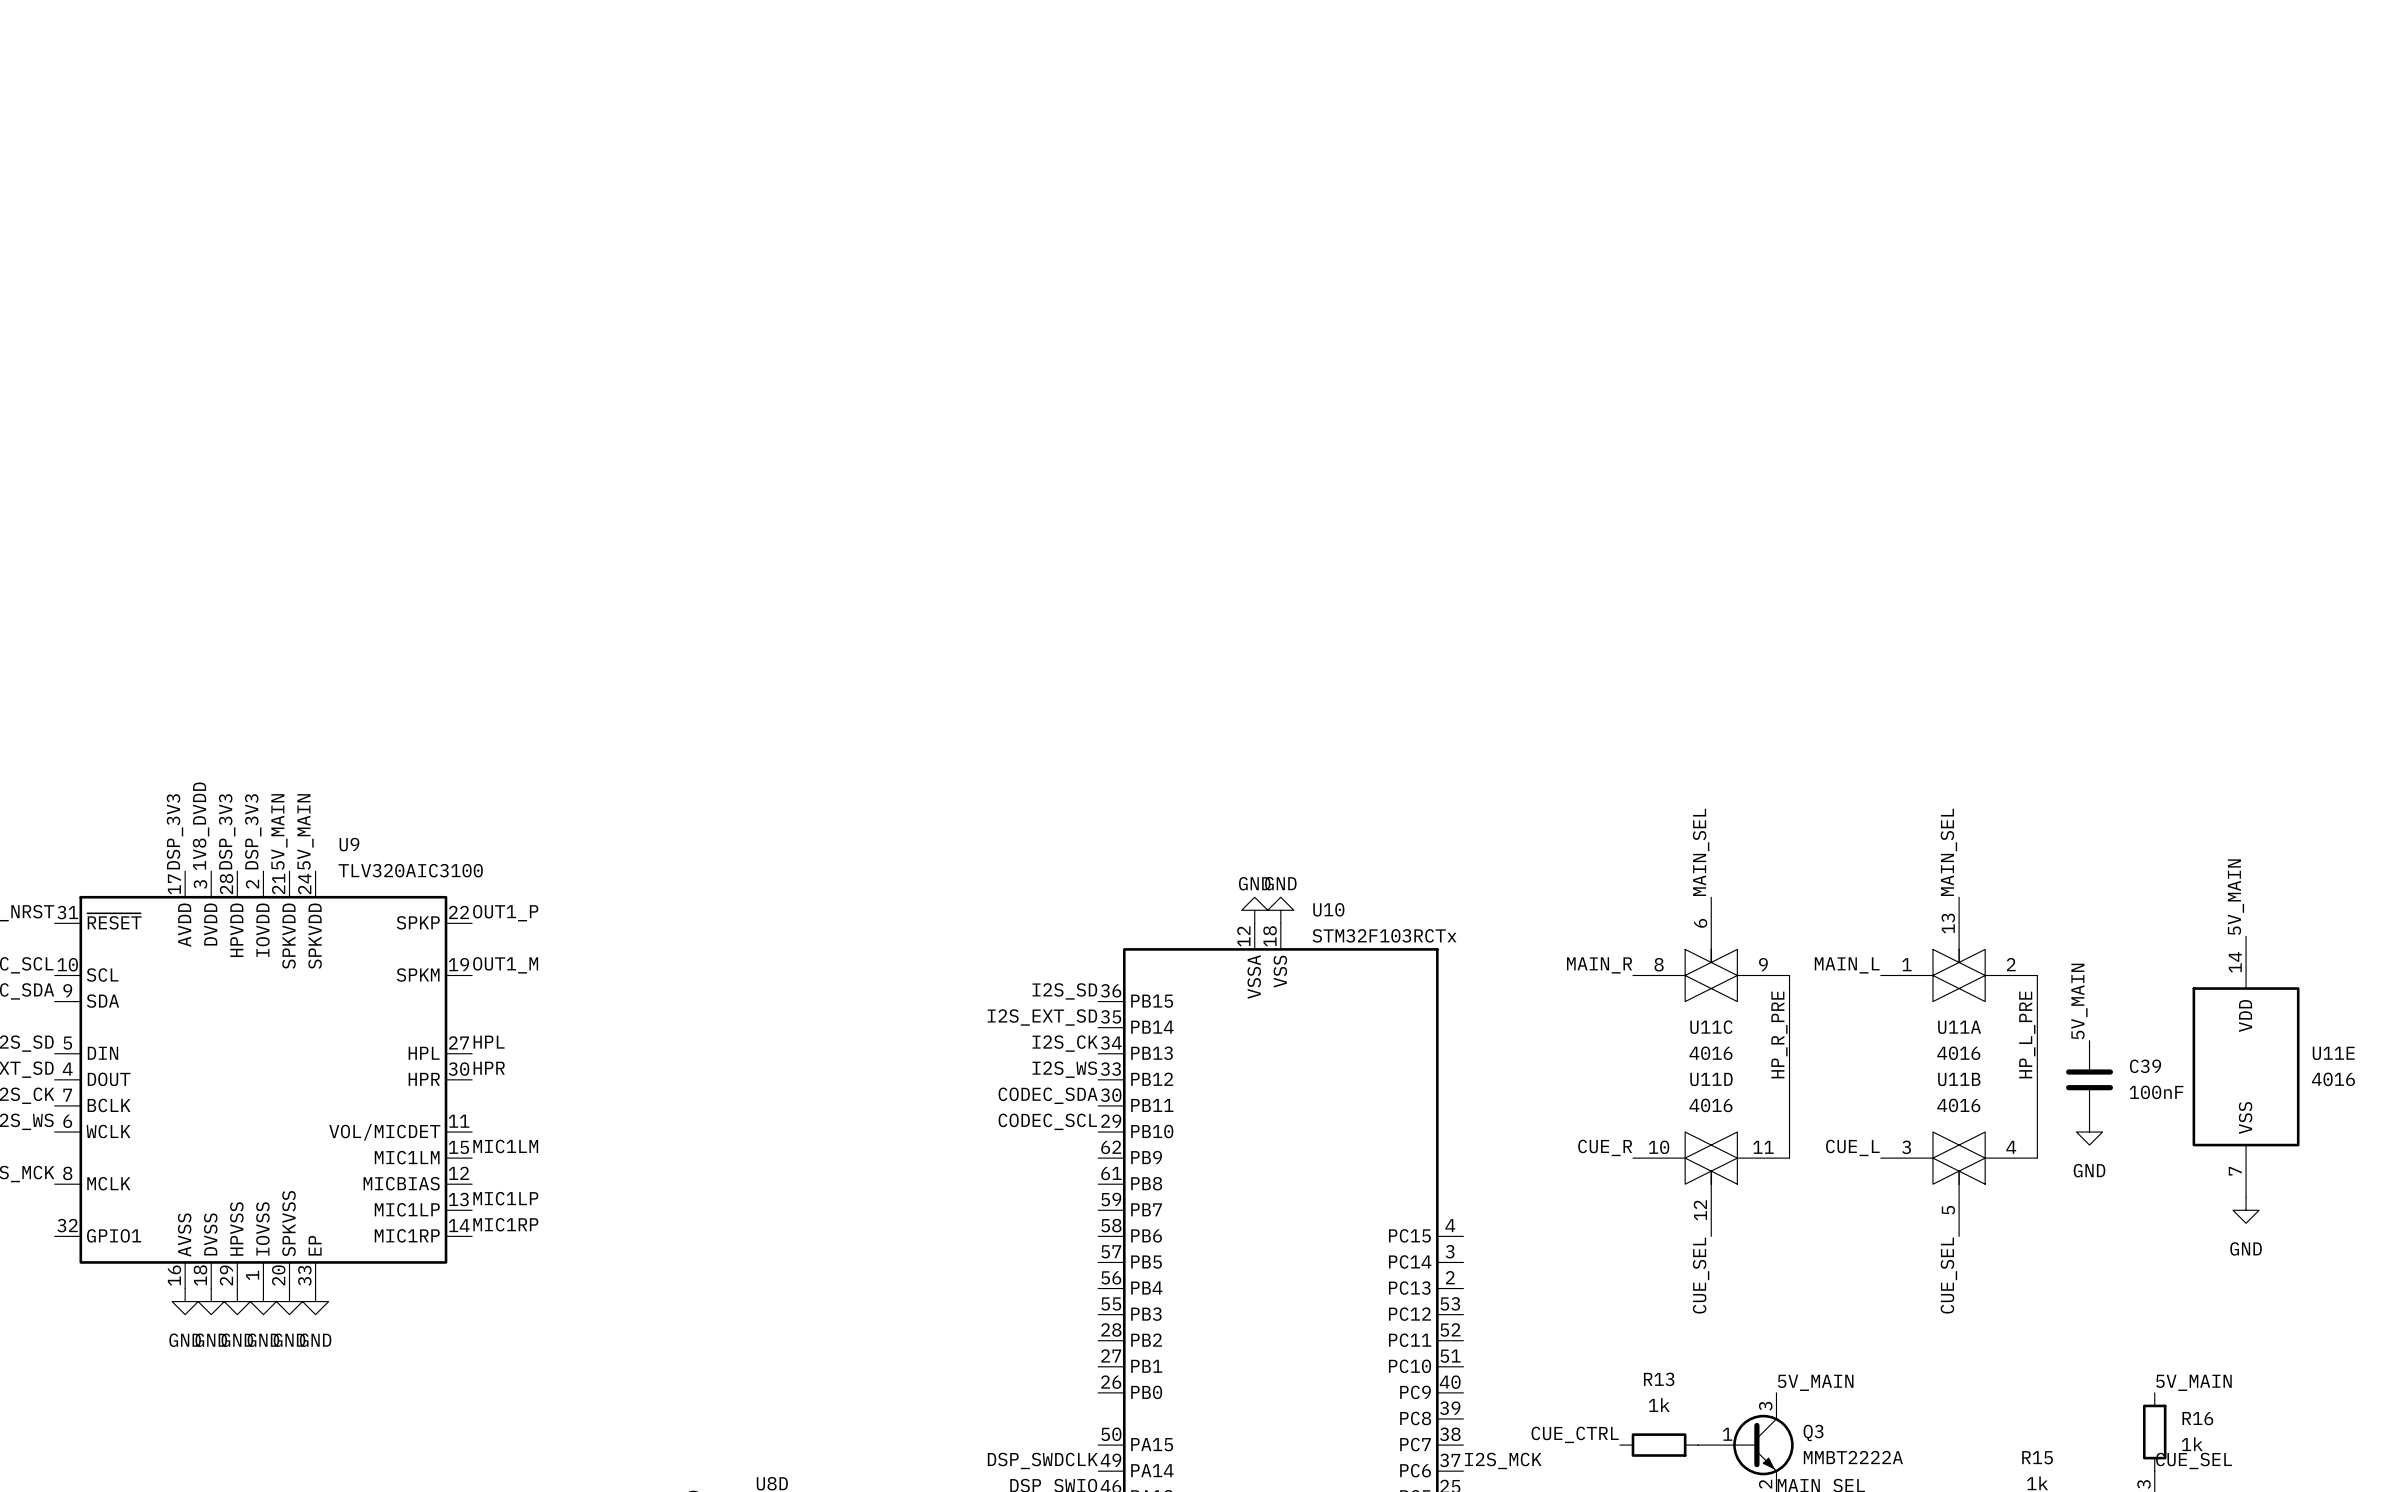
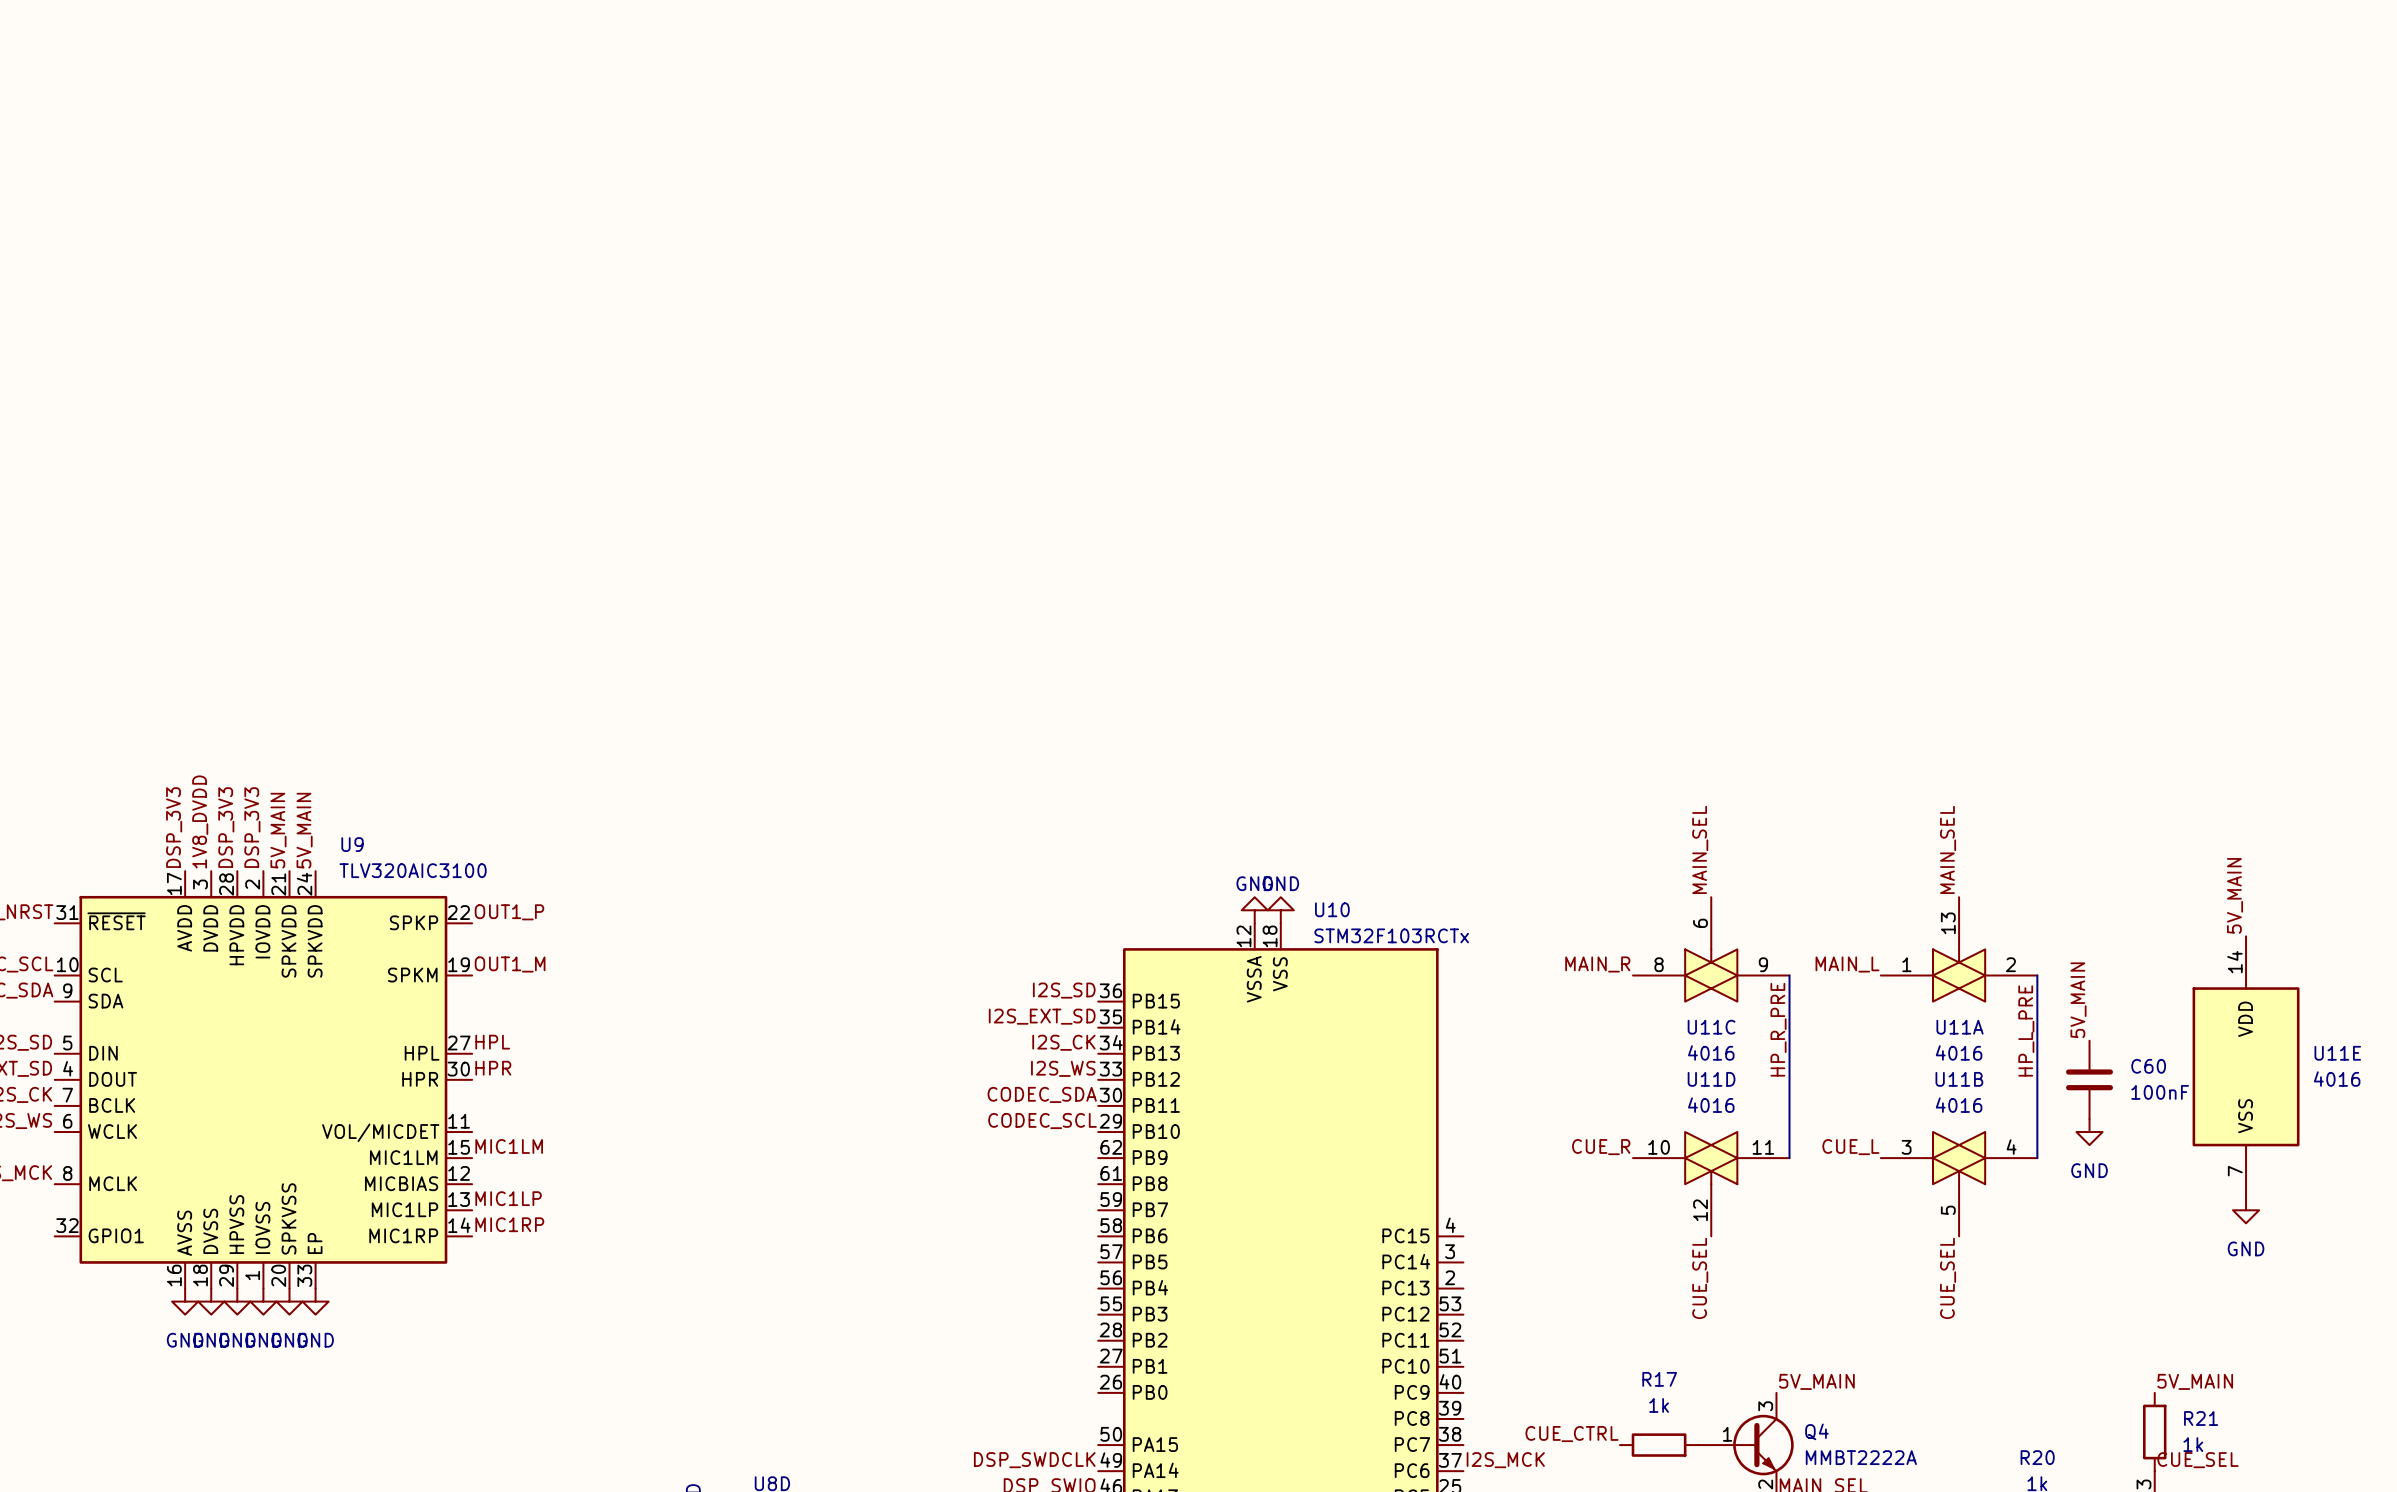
C39 name: C39 (2145, 1066) -> C60 (2148, 1066)
R13 name: R13 (1659, 1379) -> R17 (1659, 1379)
R16 name: R16 (2197, 1418) -> R21 (2201, 1418)
Q3 name: Q3 (1813, 1432) -> Q4 (1816, 1431)
R15 name: R15 (2037, 1457) -> R20 (2037, 1457)

